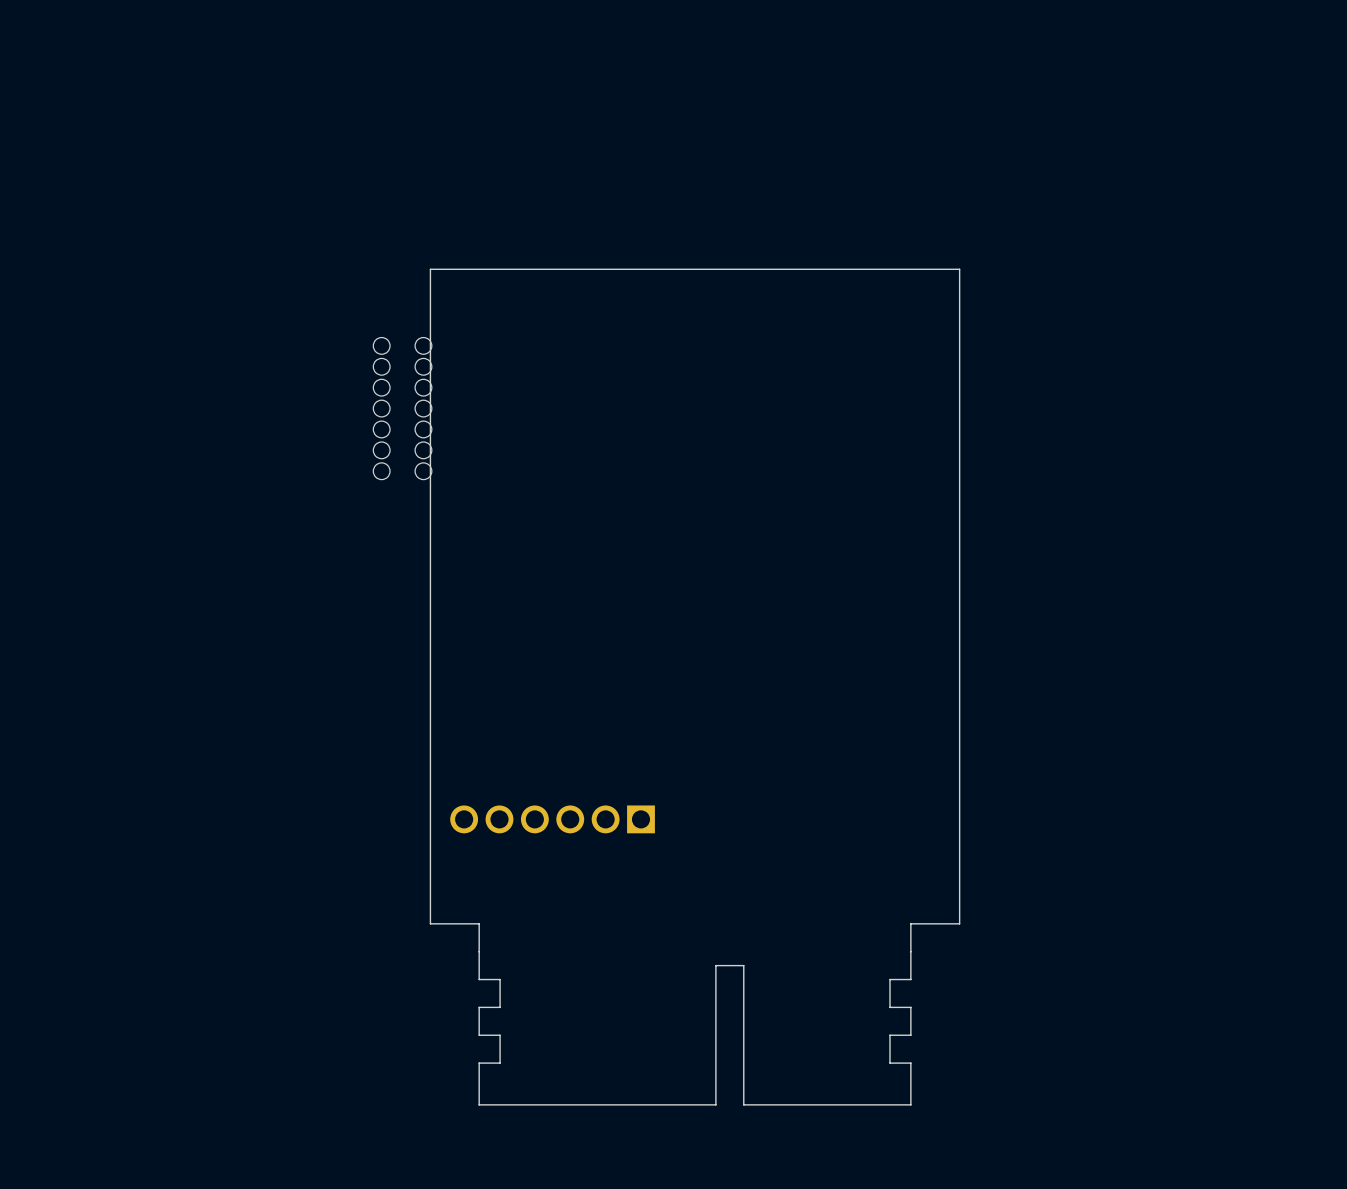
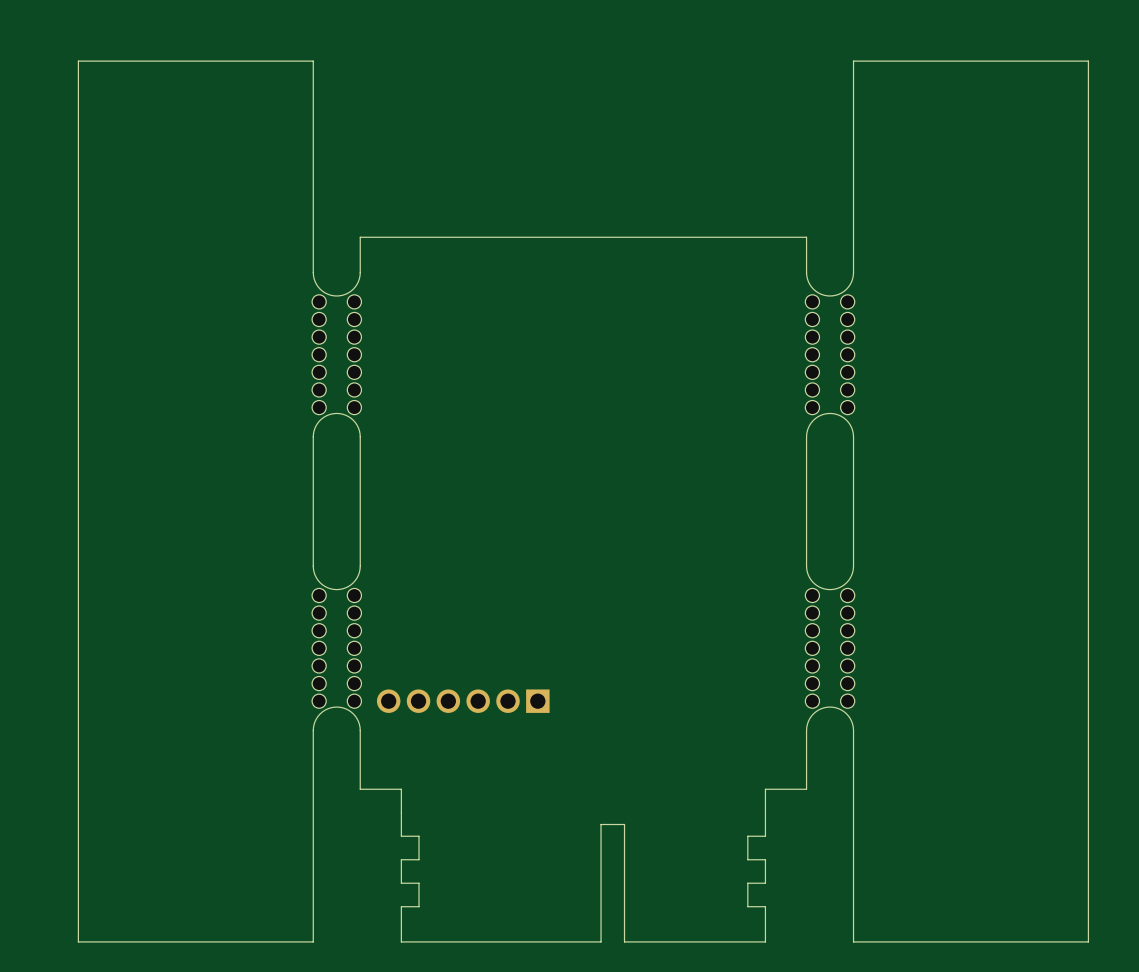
board edge: (430, 311) (430, 506) -> (360, 272) (358, 281) (353, 289) (339, 295) (325, 292) (318, 286) (314, 278) (313, 61) (78, 61) (78, 941) (313, 941) (314, 724) (322, 711) (330, 707) (339, 707) (353, 713) (358, 721) (360, 730)
board edge: (959, 311) (959, 506) -> (806, 272) (808, 281) (813, 289) (826, 295) (841, 292) (848, 286) (852, 278) (853, 61) (1088, 61) (1088, 941) (853, 941) (852, 724) (844, 711) (836, 707) (826, 707) (813, 713) (808, 721) (806, 730)
part: none -> (830, 354)
board edge: (430, 659) (430, 854) -> (360, 566) (358, 575) (353, 582) (345, 587) (336, 589) (327, 587) (320, 582) (315, 575) (313, 566) (313, 436) (315, 427) (325, 416) (333, 413) (342, 414) (355, 422) (360, 436)
board edge: (959, 659) (959, 854) -> (806, 566) (808, 575) (813, 582) (821, 587) (830, 589) (839, 587) (846, 582) (851, 575) (853, 566) (853, 436) (851, 427) (841, 416) (833, 413) (823, 414) (811, 422) (806, 436)
part: none -> (336, 648)
part: none -> (830, 648)

